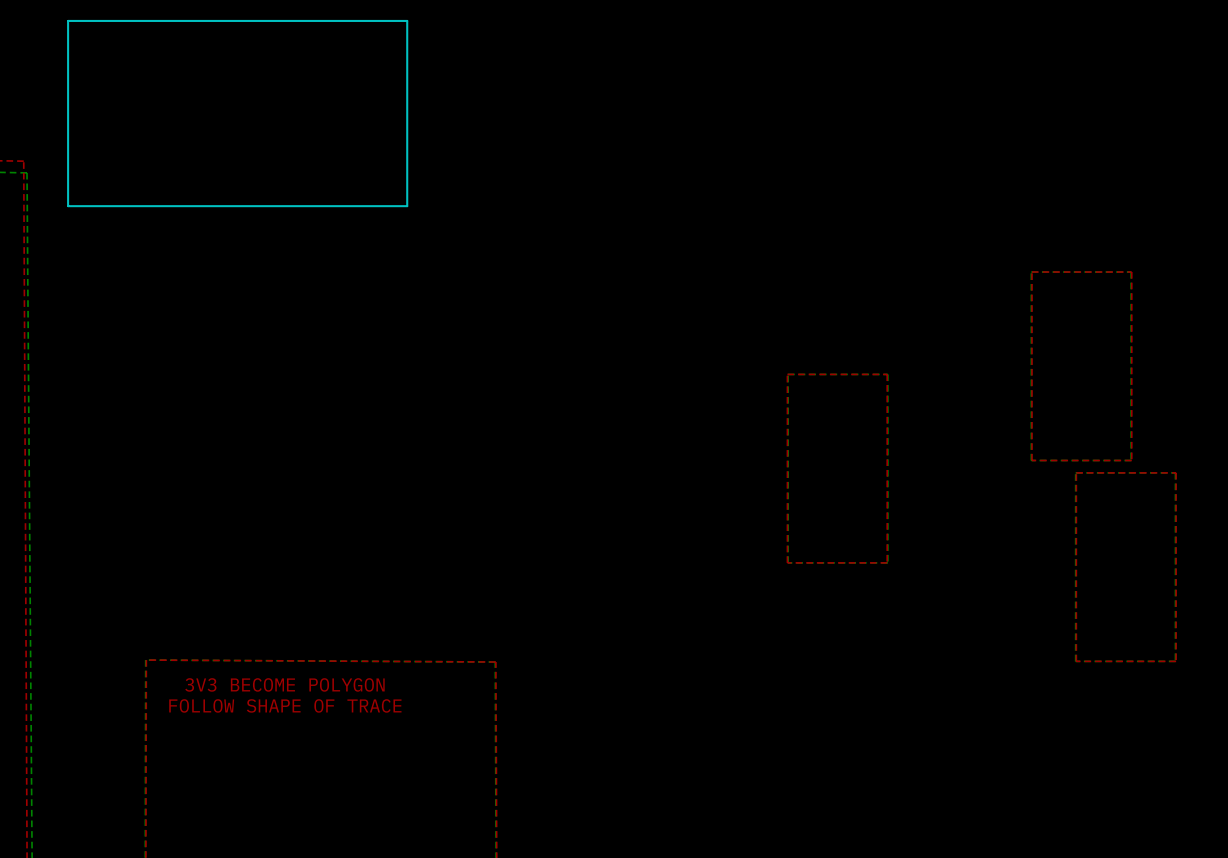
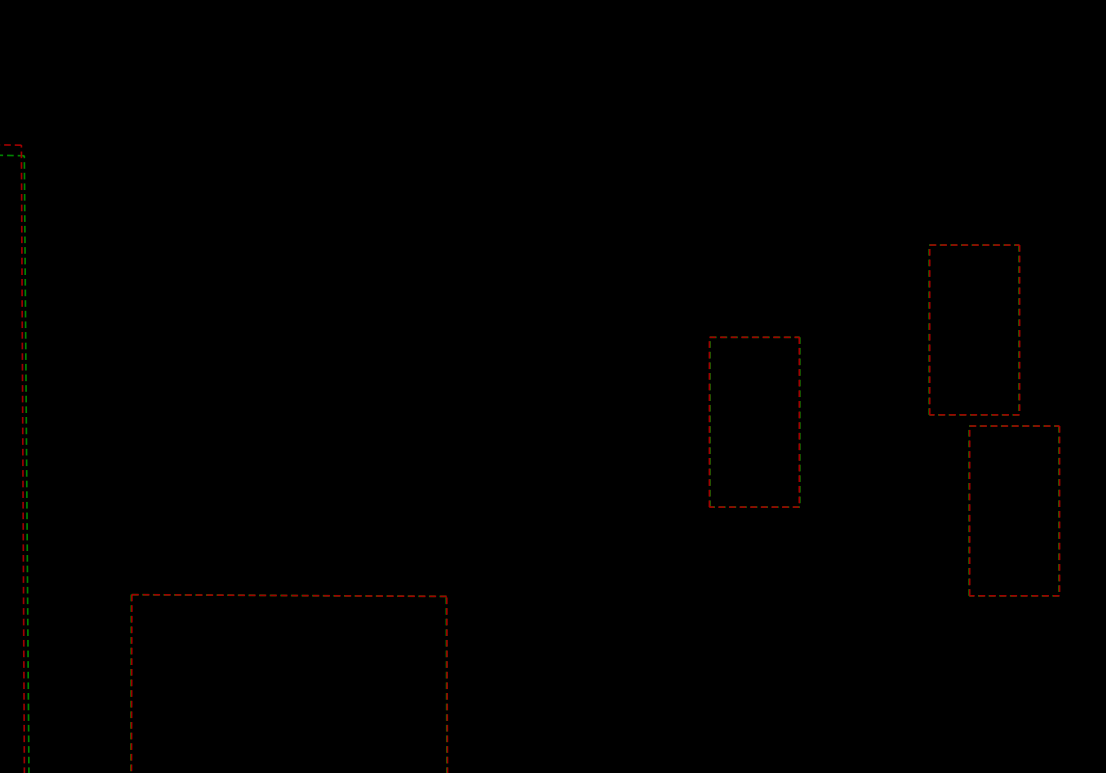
line: (68, 20) (68, 206) (407, 206) (407, 20) (68, 20) -> none
text: 3V3 BECOME POLYGON (284, 684) -> none
text: FOLLOW SHAPE OF TRACE (285, 705) -> none

